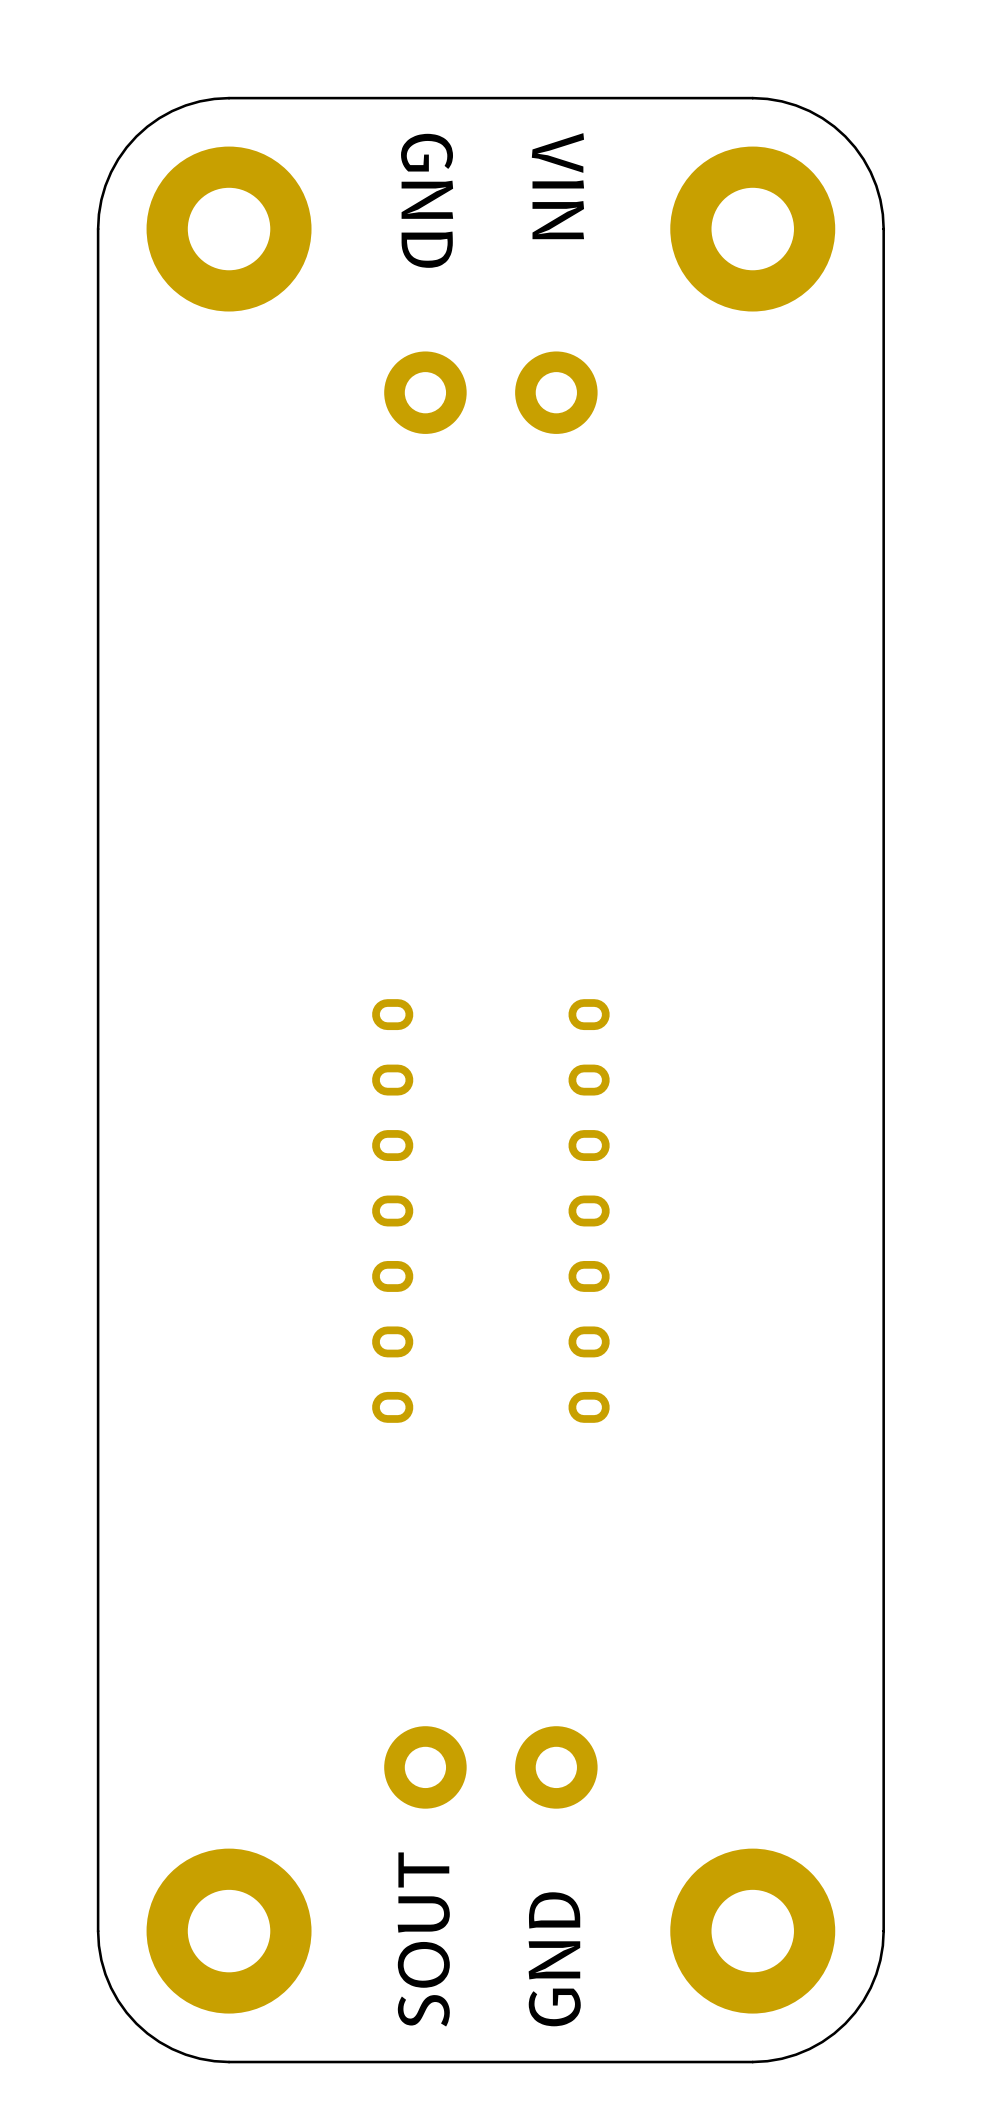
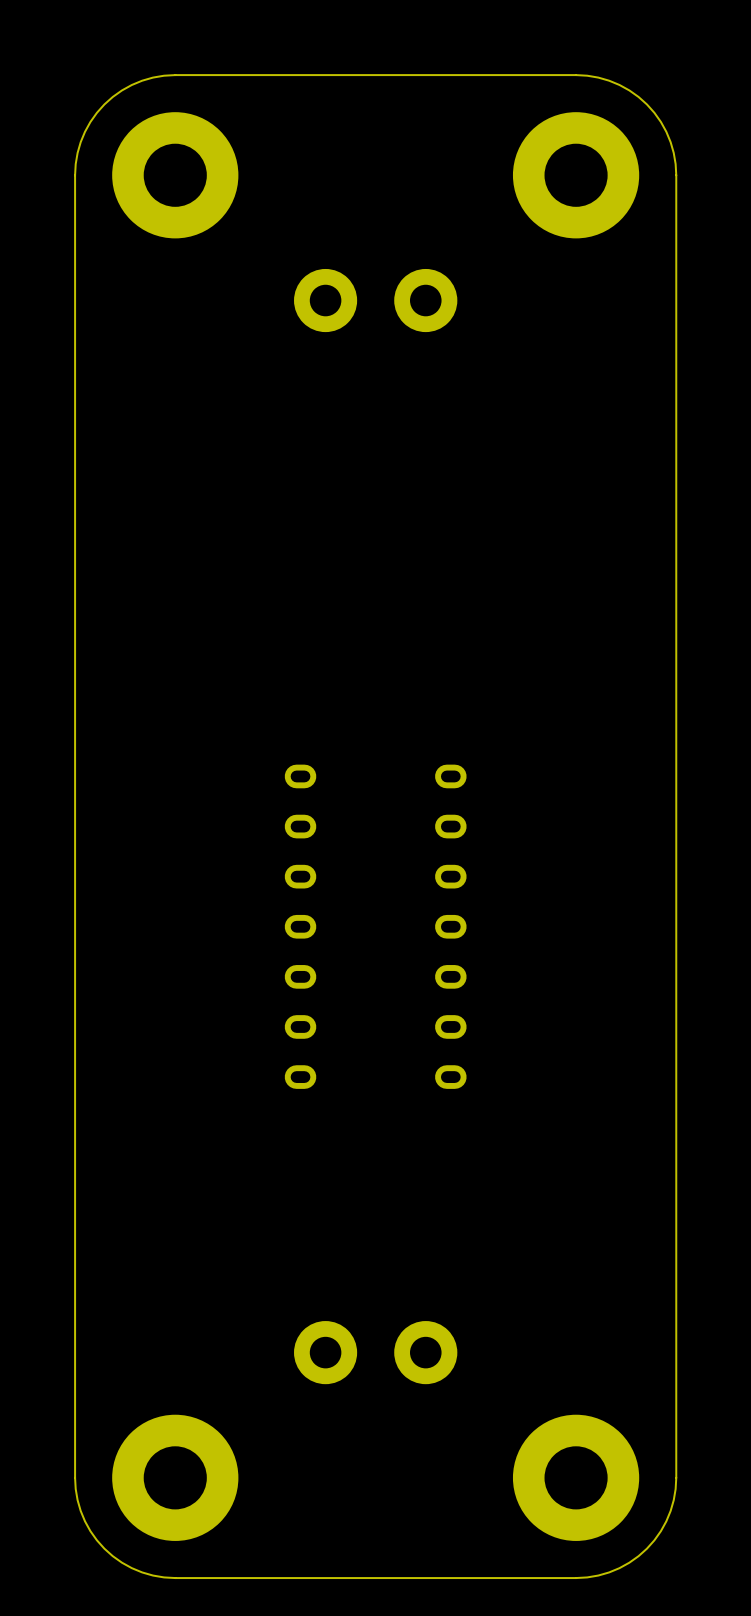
text: VIN (557, 186) -> none
text: GND (427, 200) -> none
text: SOUT (423, 1939) -> none
text: GND (554, 1959) -> none

